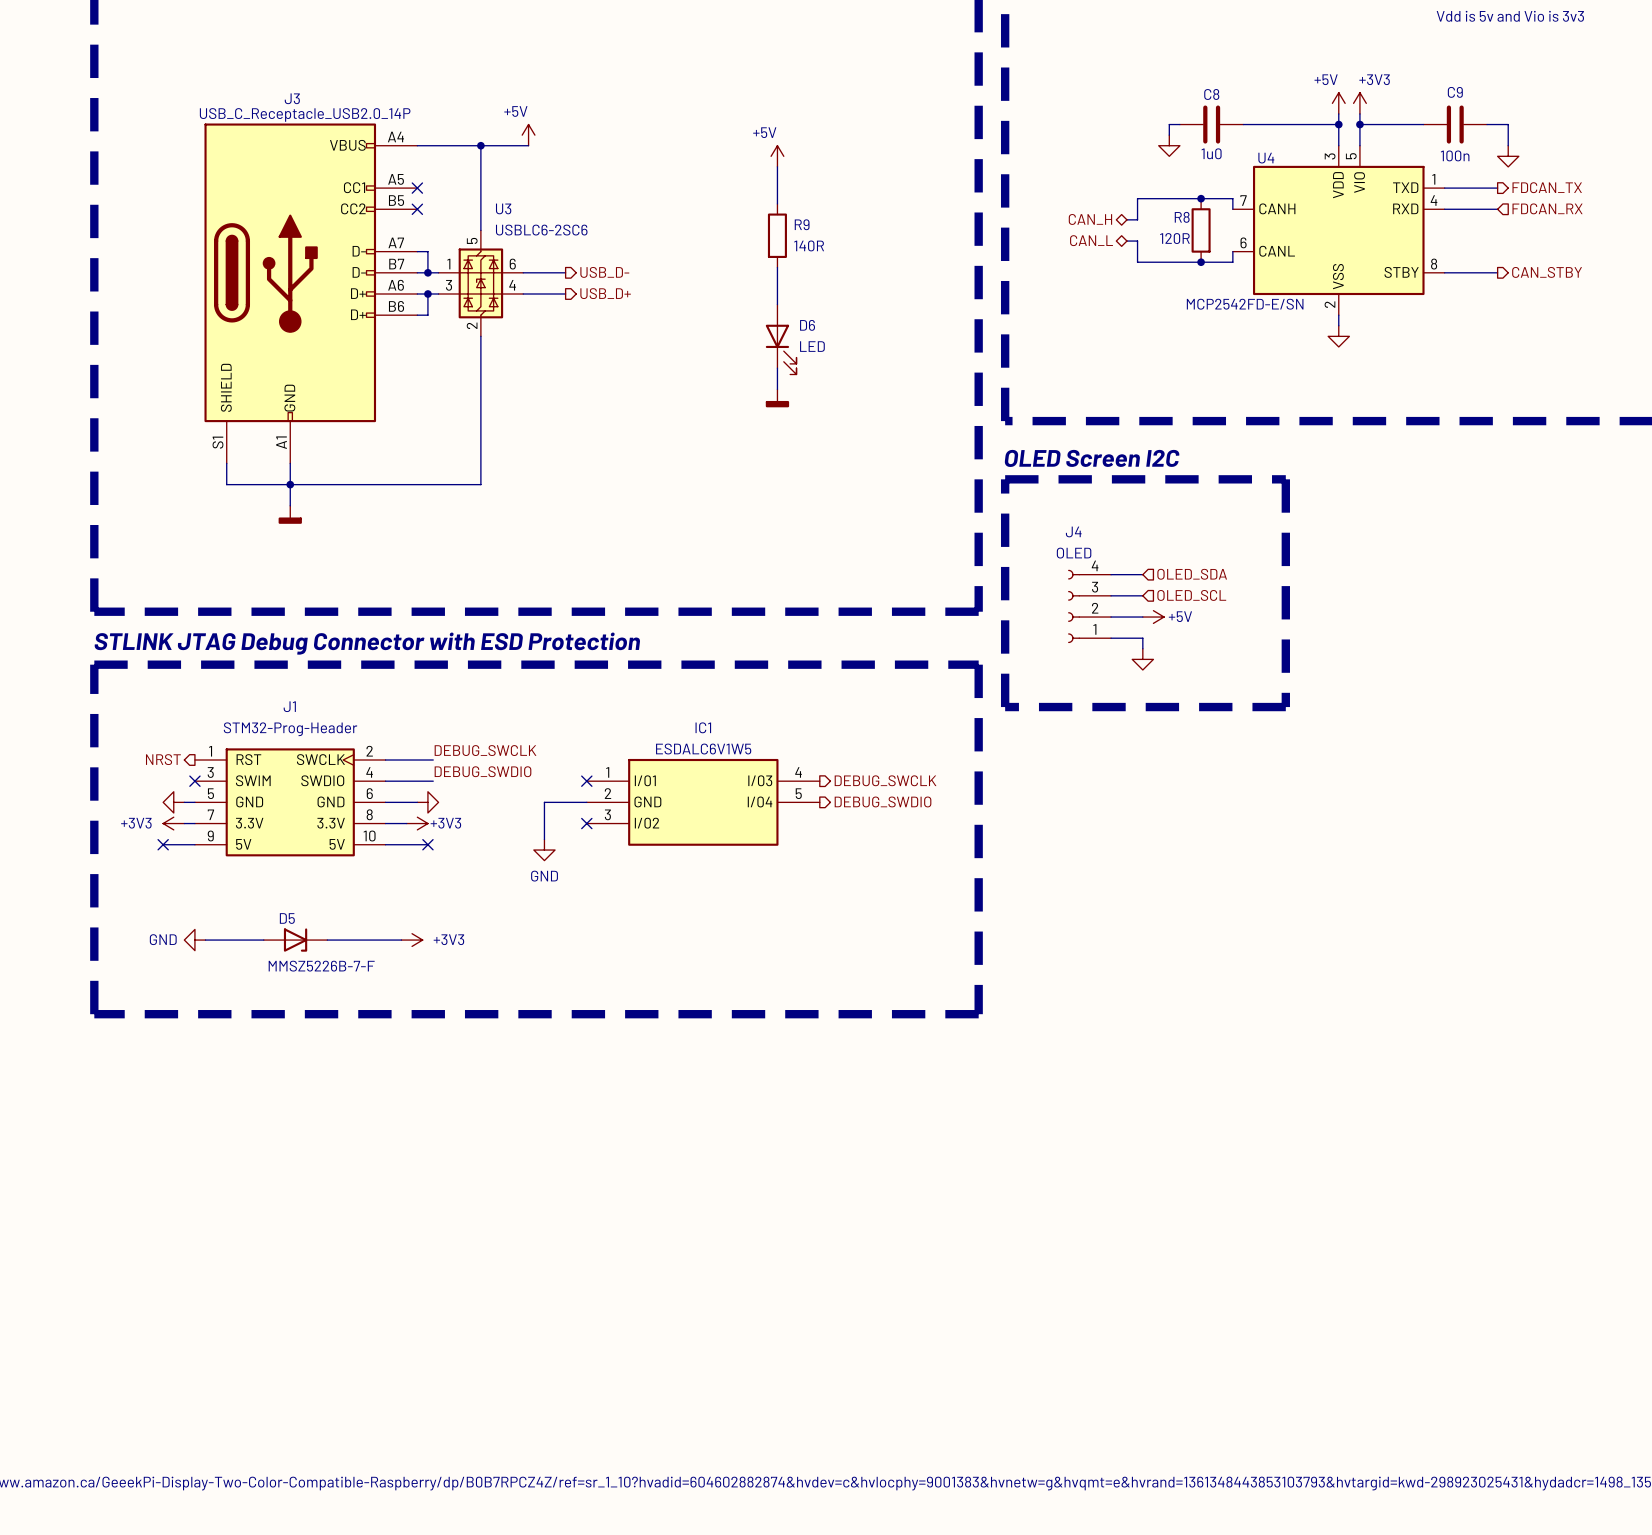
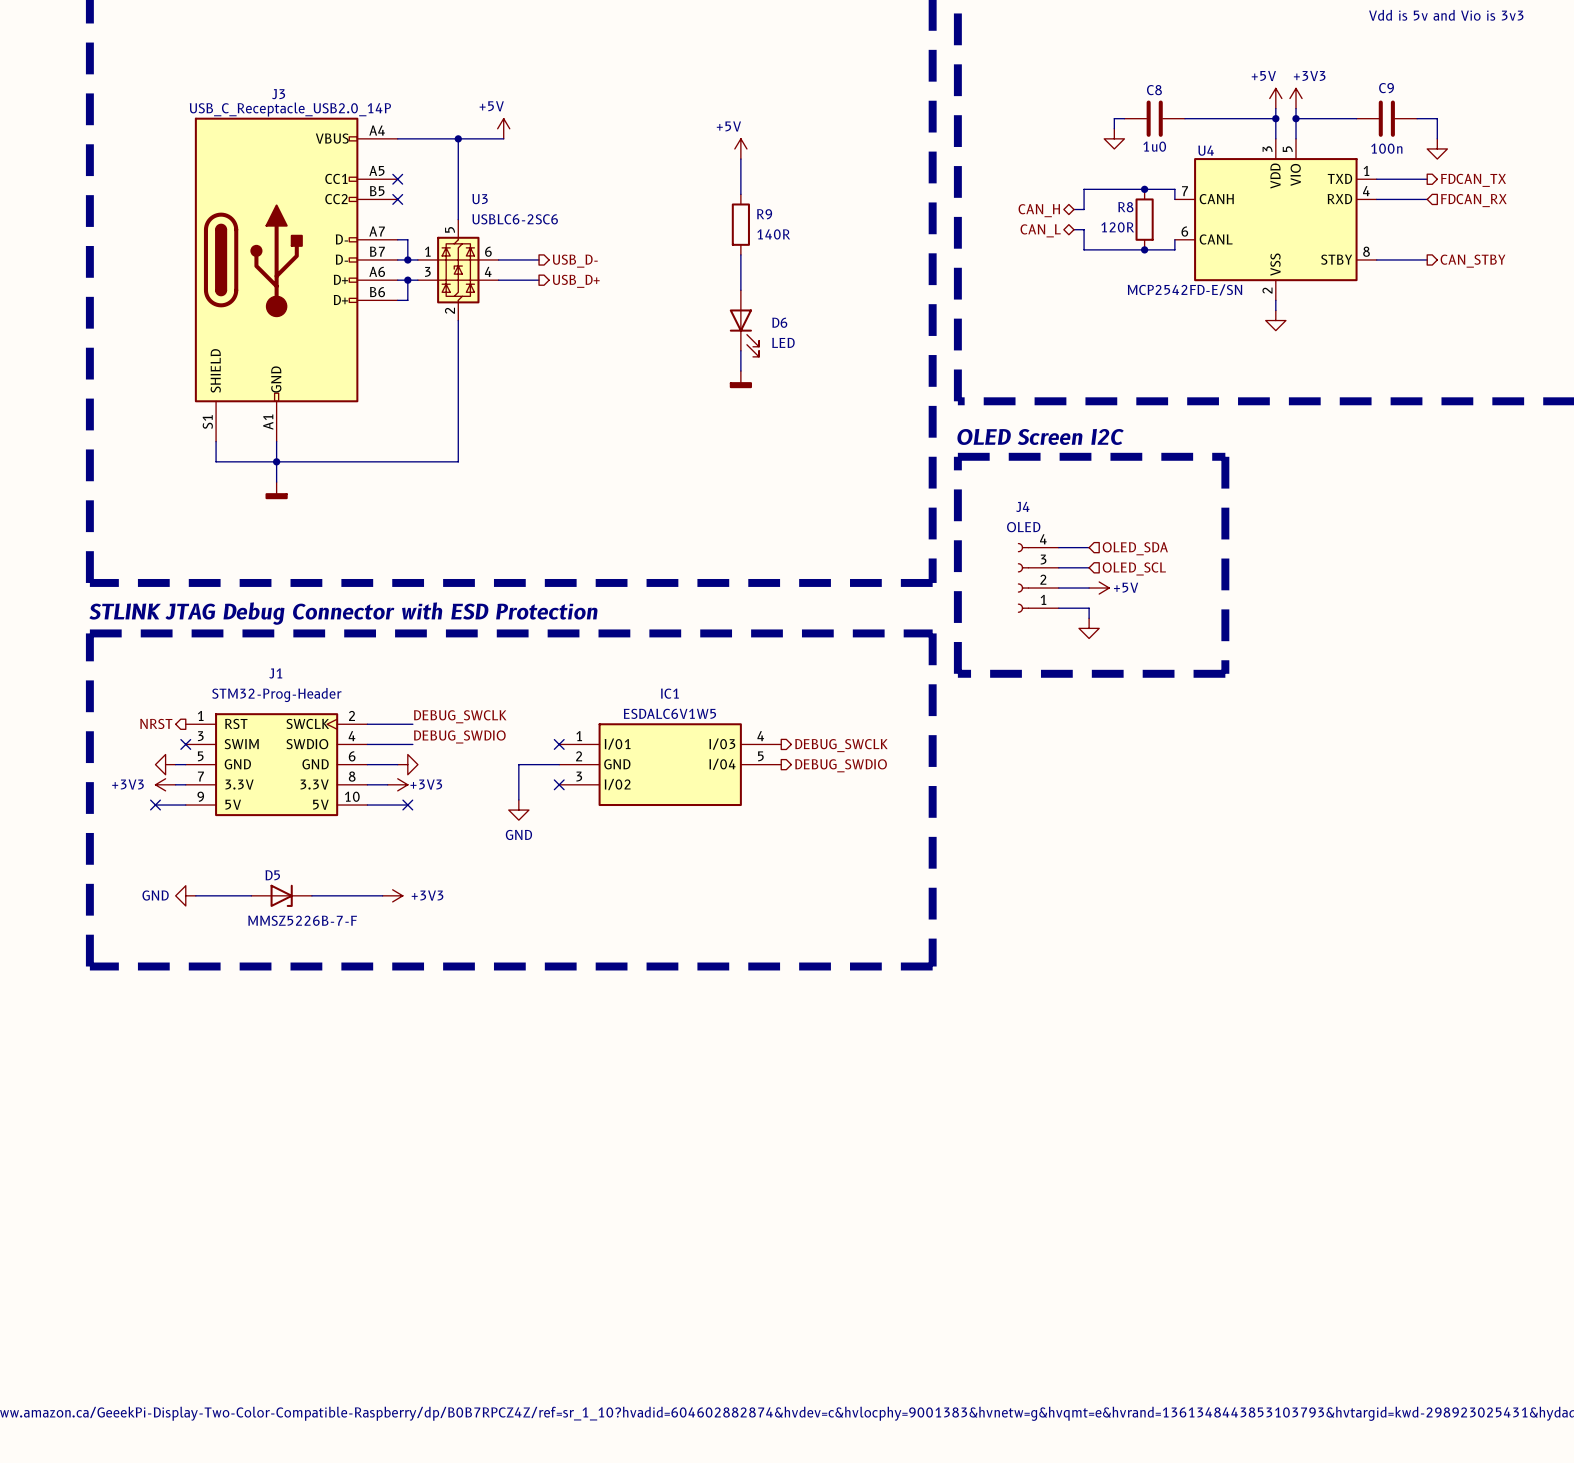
D6 name position: D6 (807, 325) -> D6 (779, 322)
D6 value position: LED (812, 346) -> LED (783, 342)

